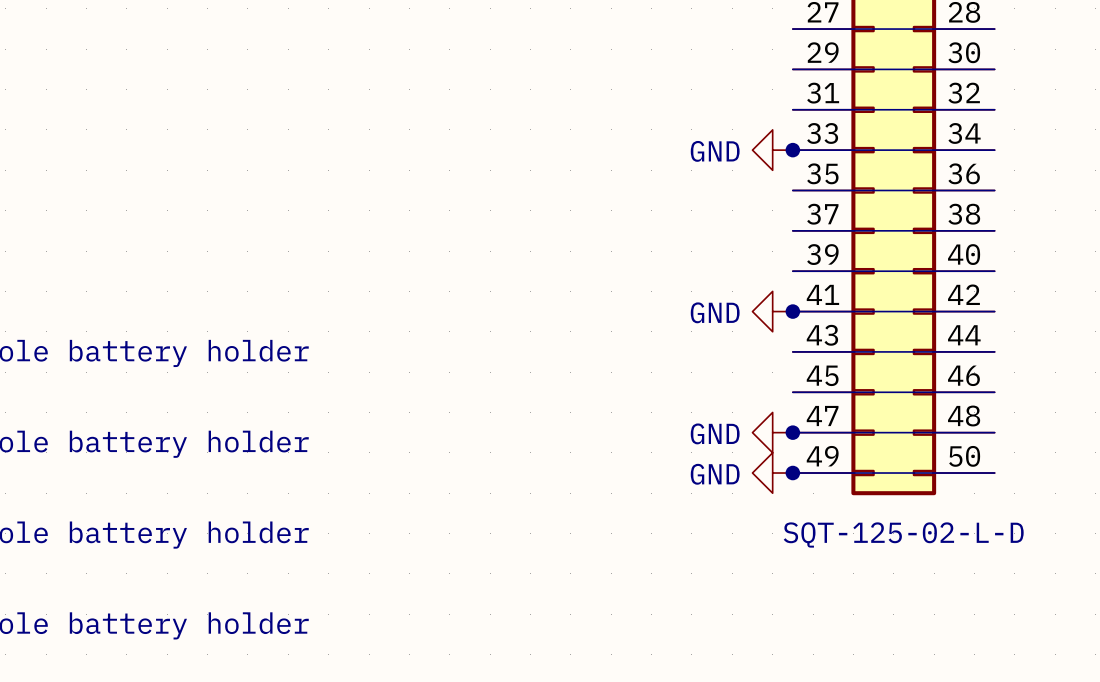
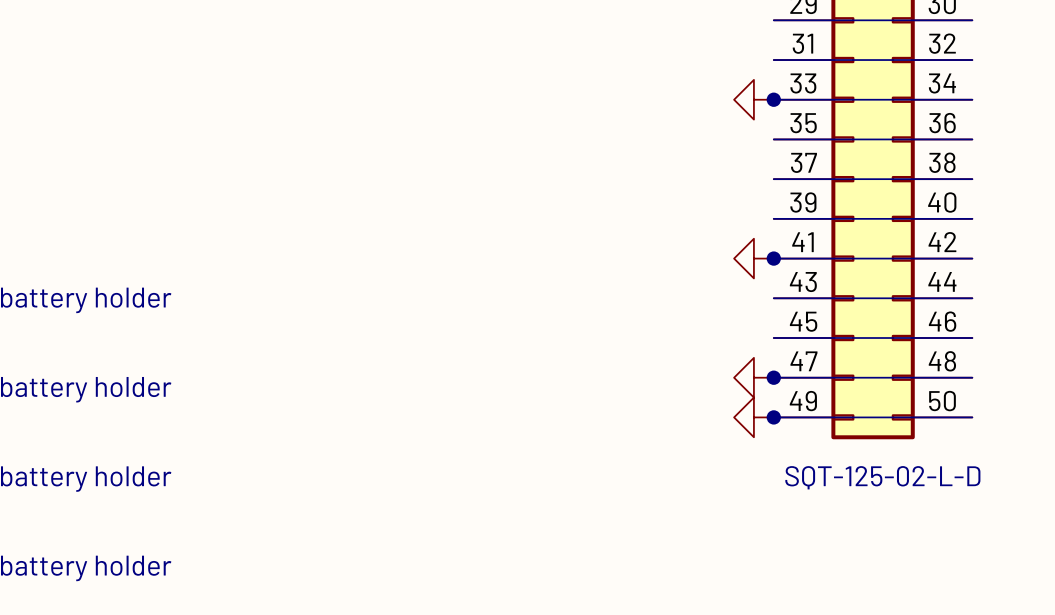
power symbol text: GND (715, 151) -> none
power symbol text: GND (715, 312) -> none
power symbol text: GND (715, 433) -> none
power symbol text: GND (715, 474) -> none

